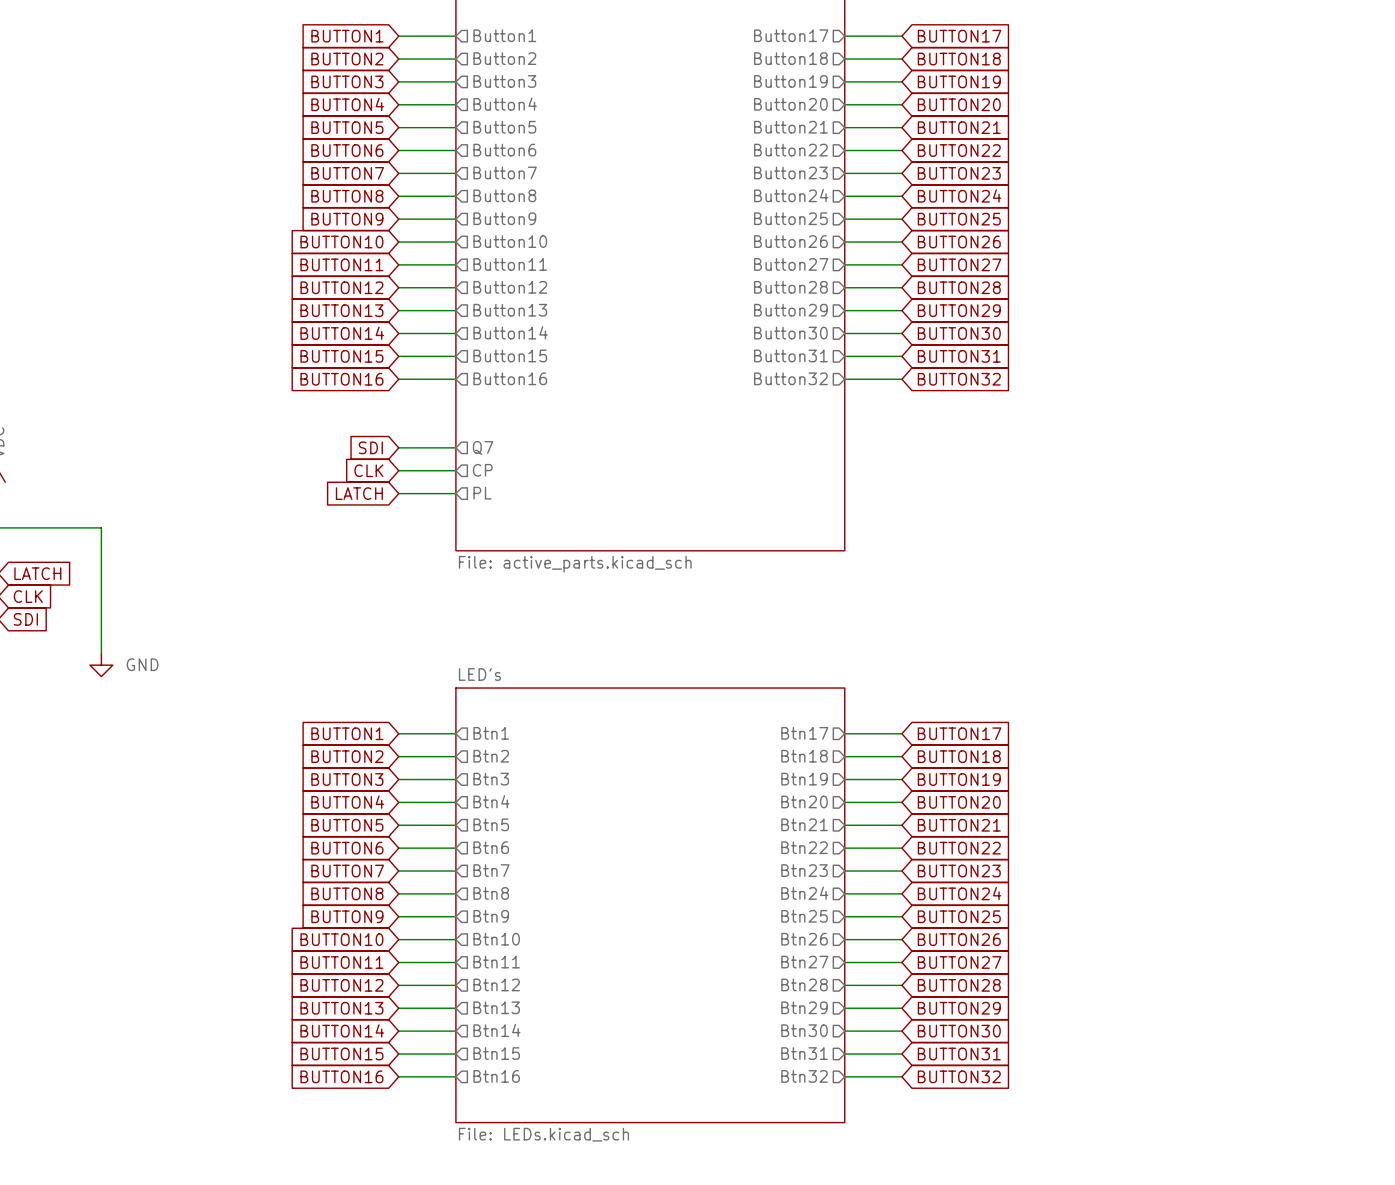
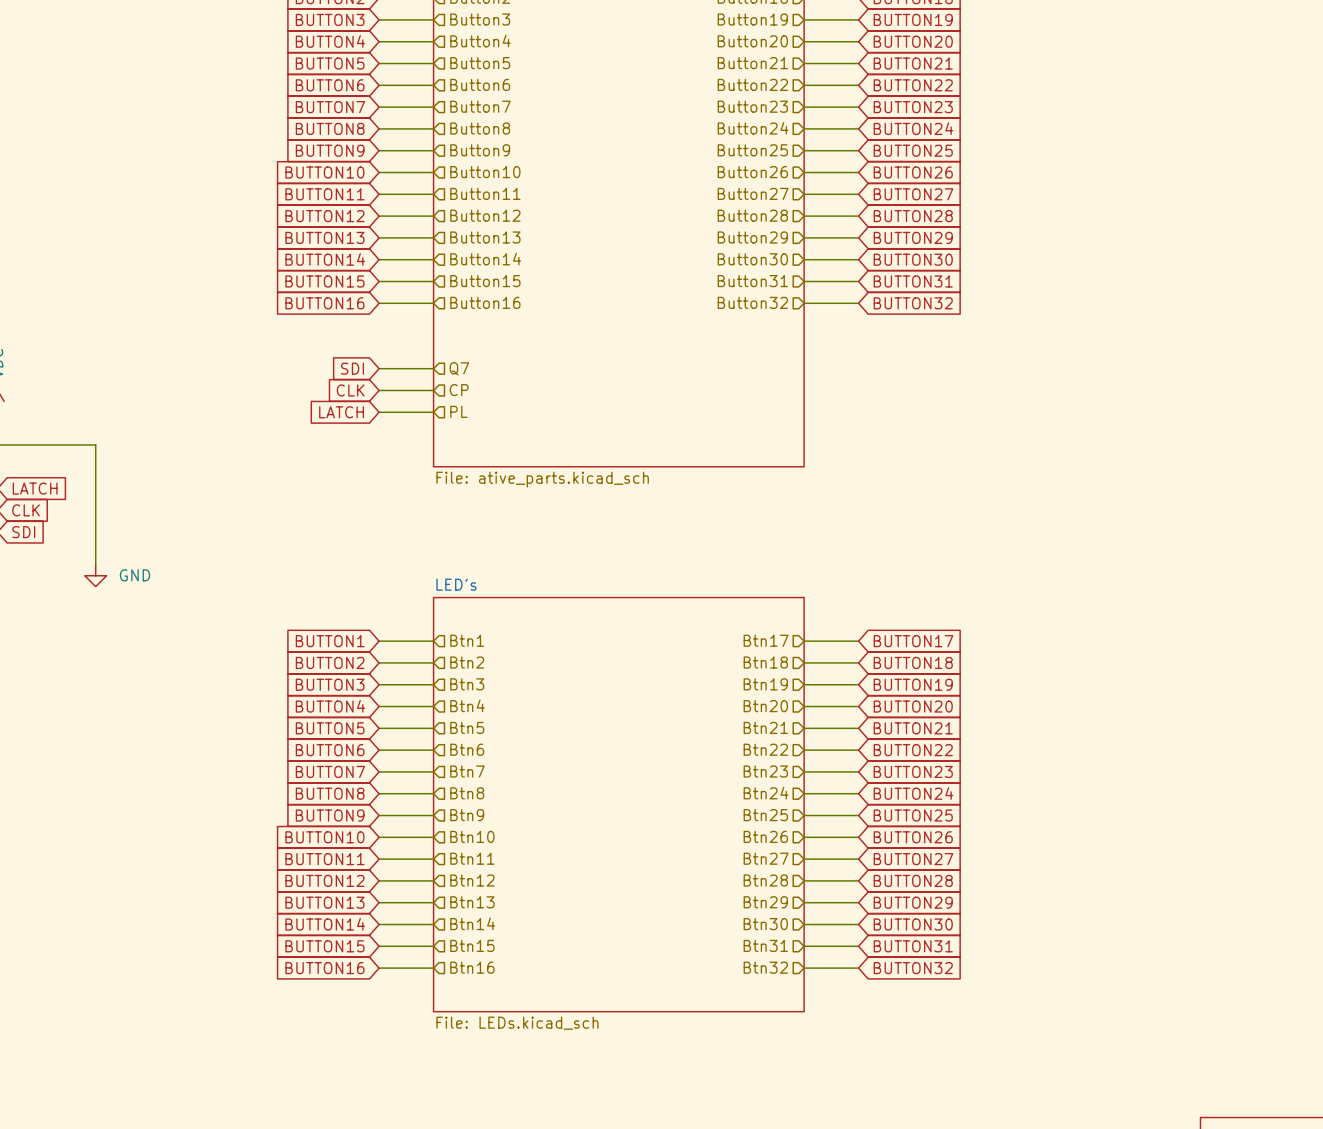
sheet value: File: active_parts.kicad_sch (575, 564) -> File: ative_parts.kicad_sch (542, 479)

